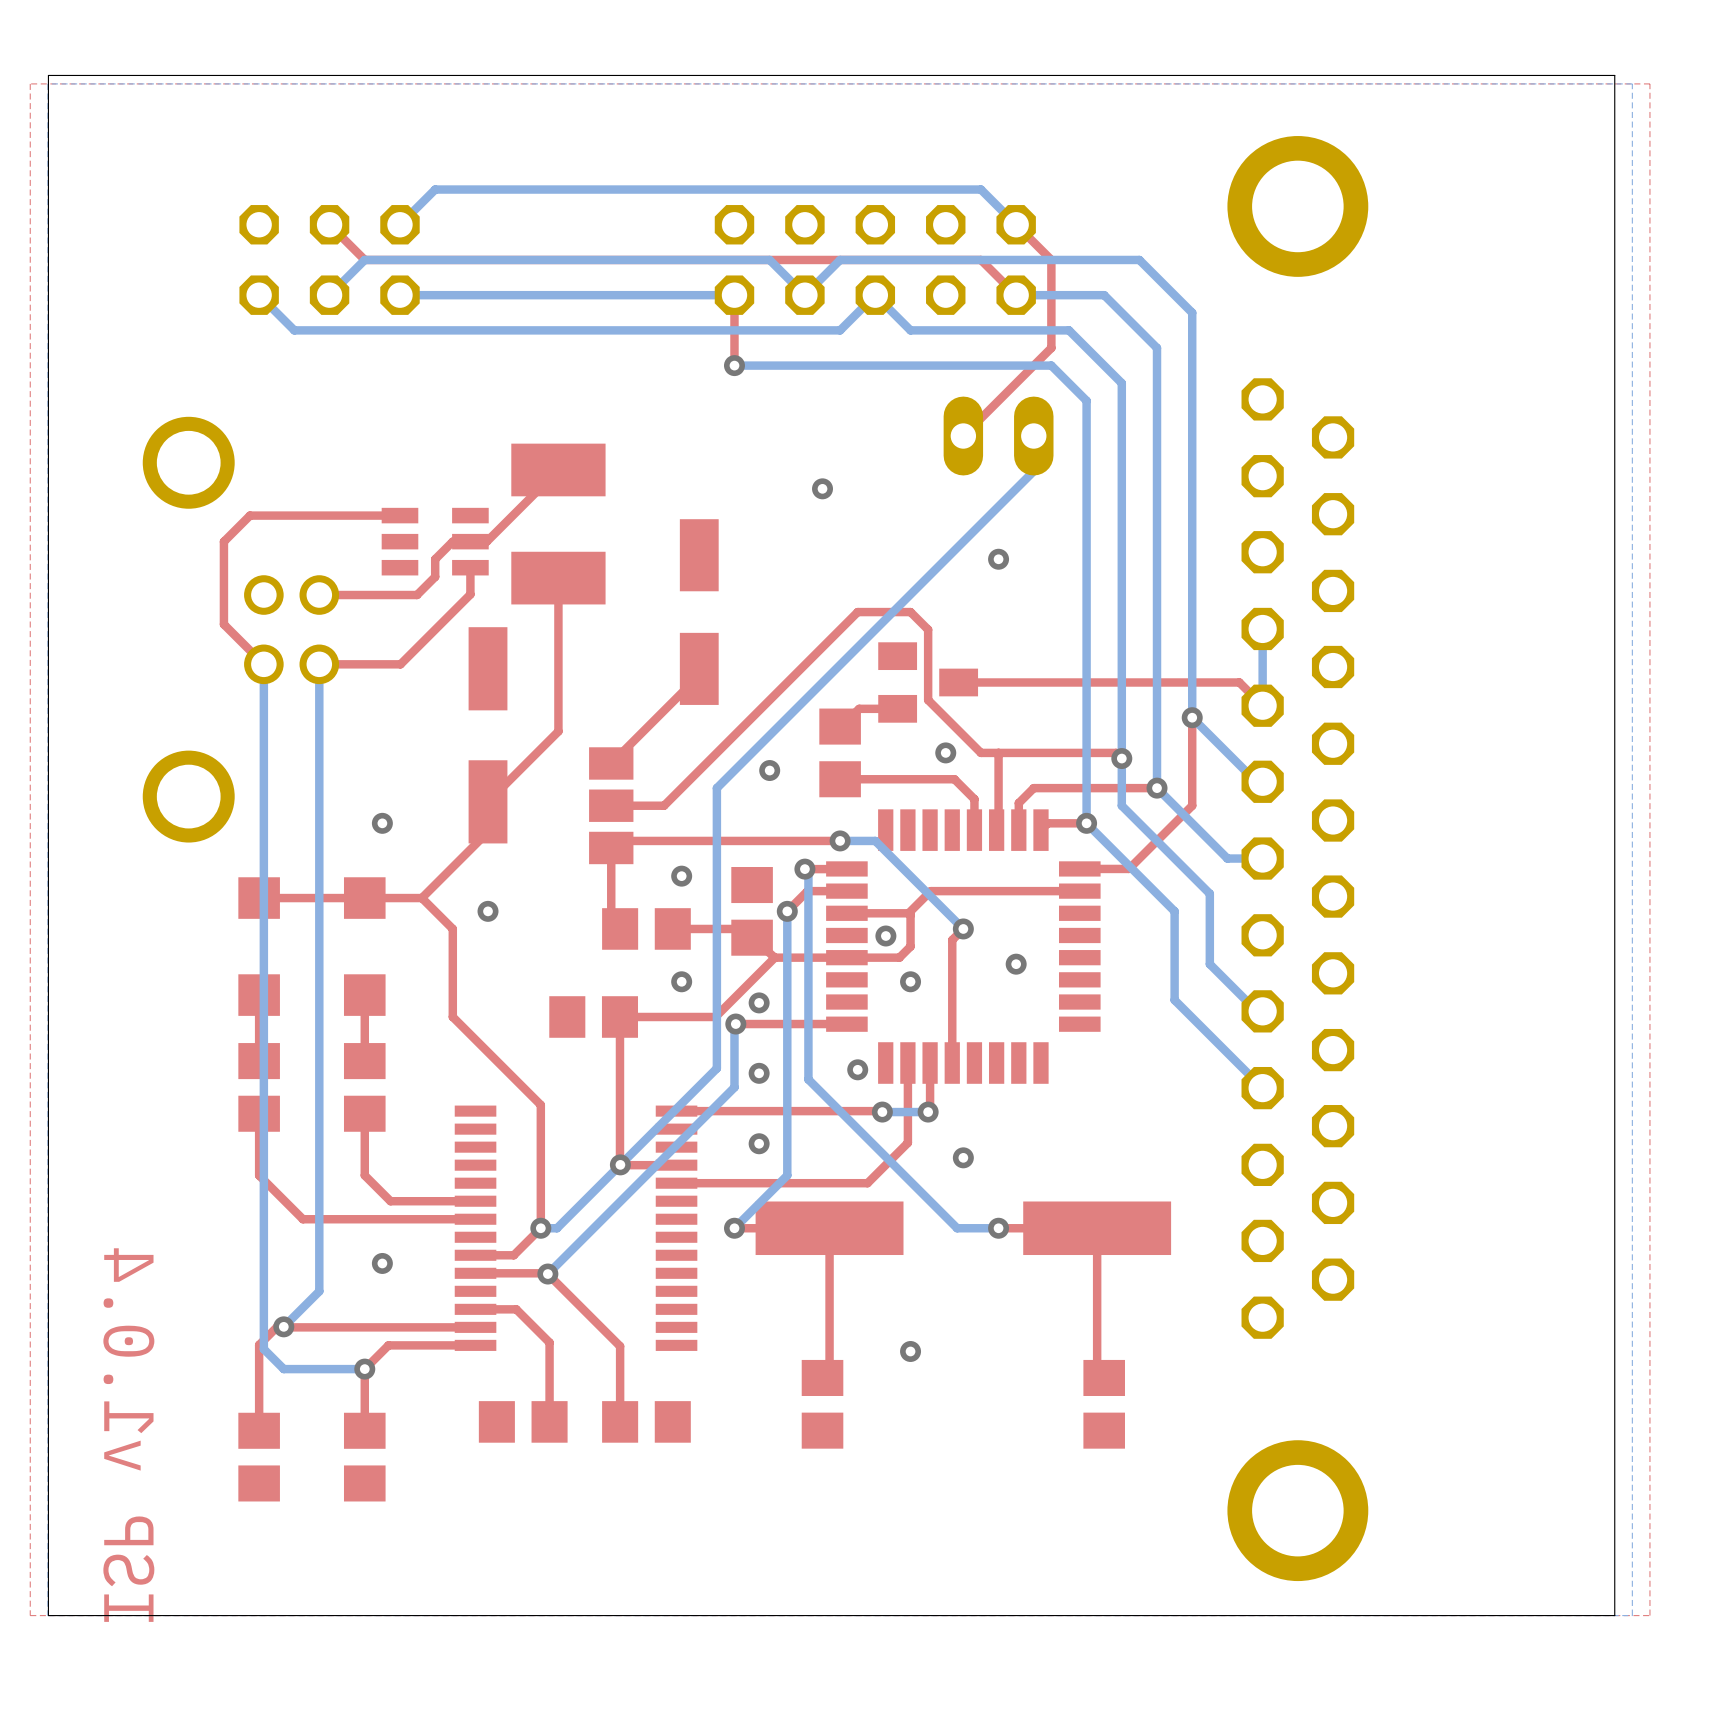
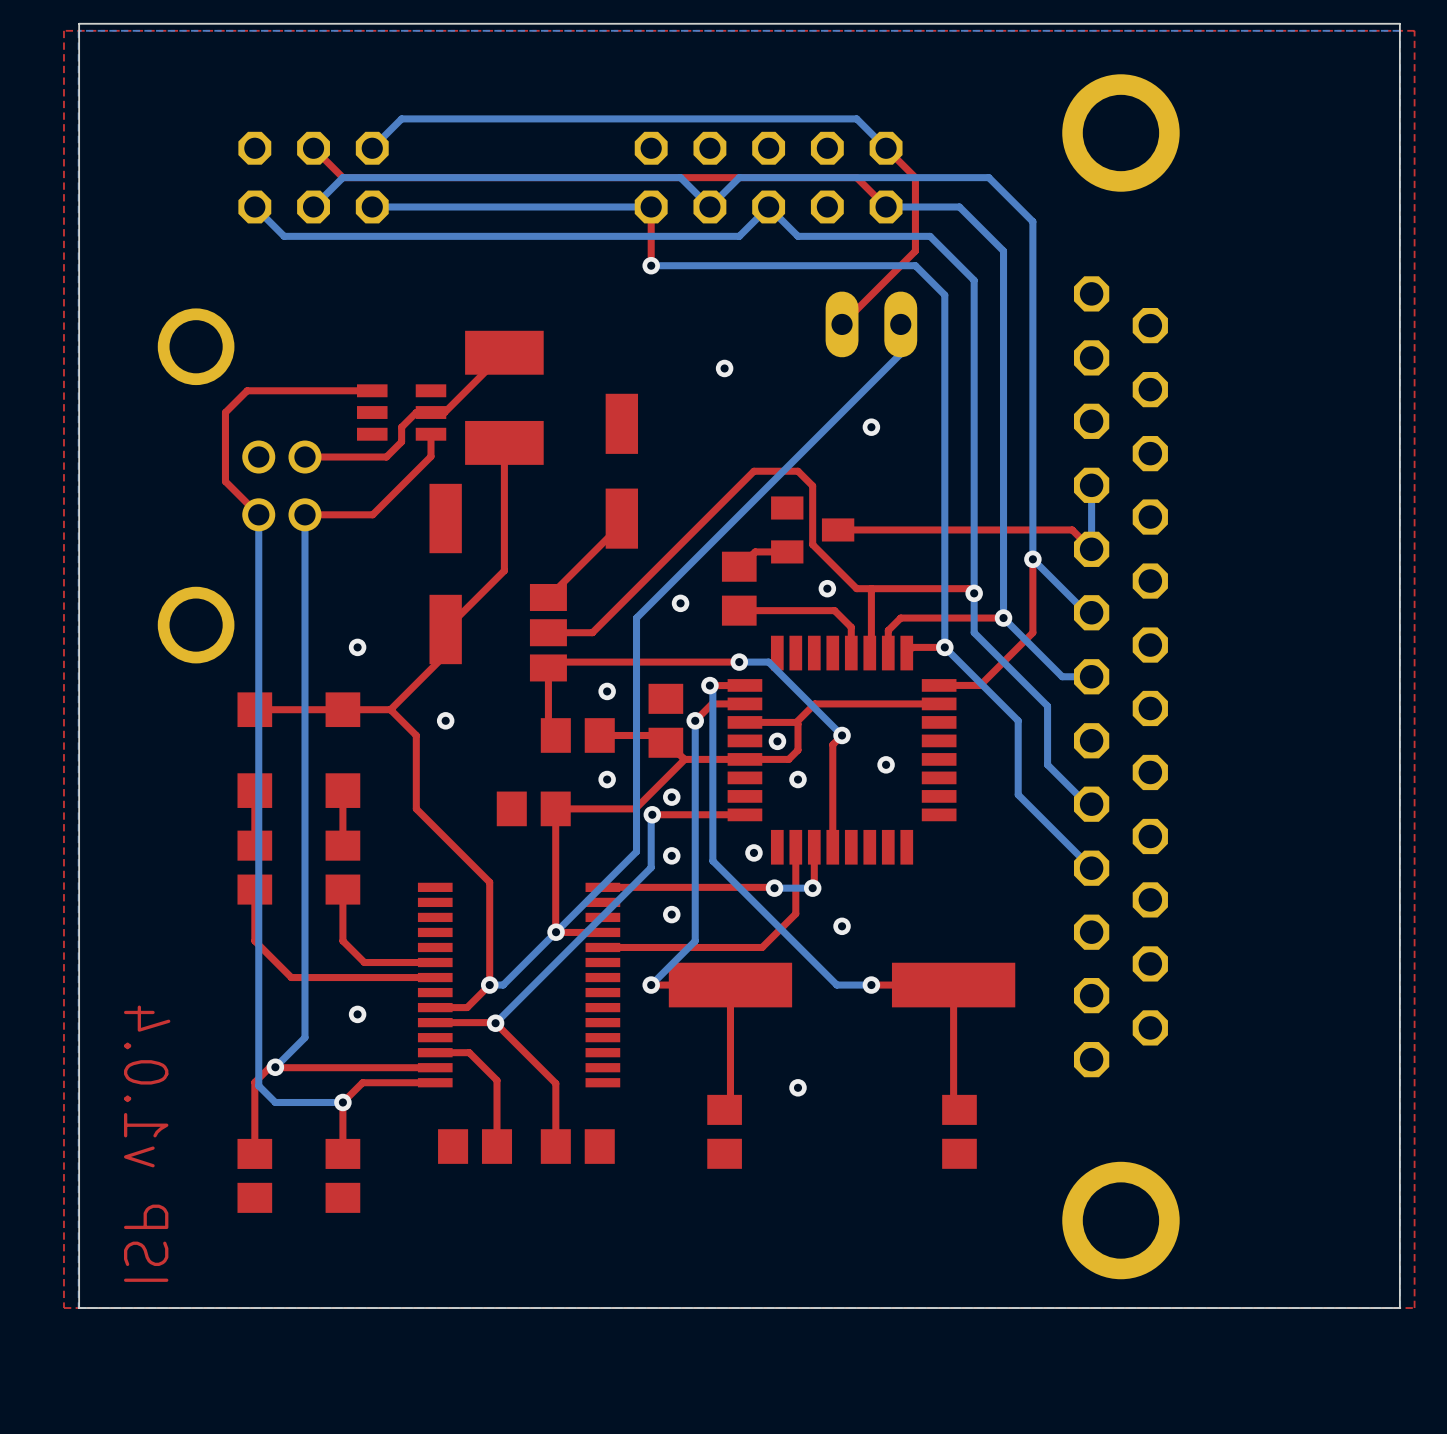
board edge: (1614, 75) (1614, 1615) -> (1385, 23) (1399, 23) (1399, 1308) (1385, 1308)

